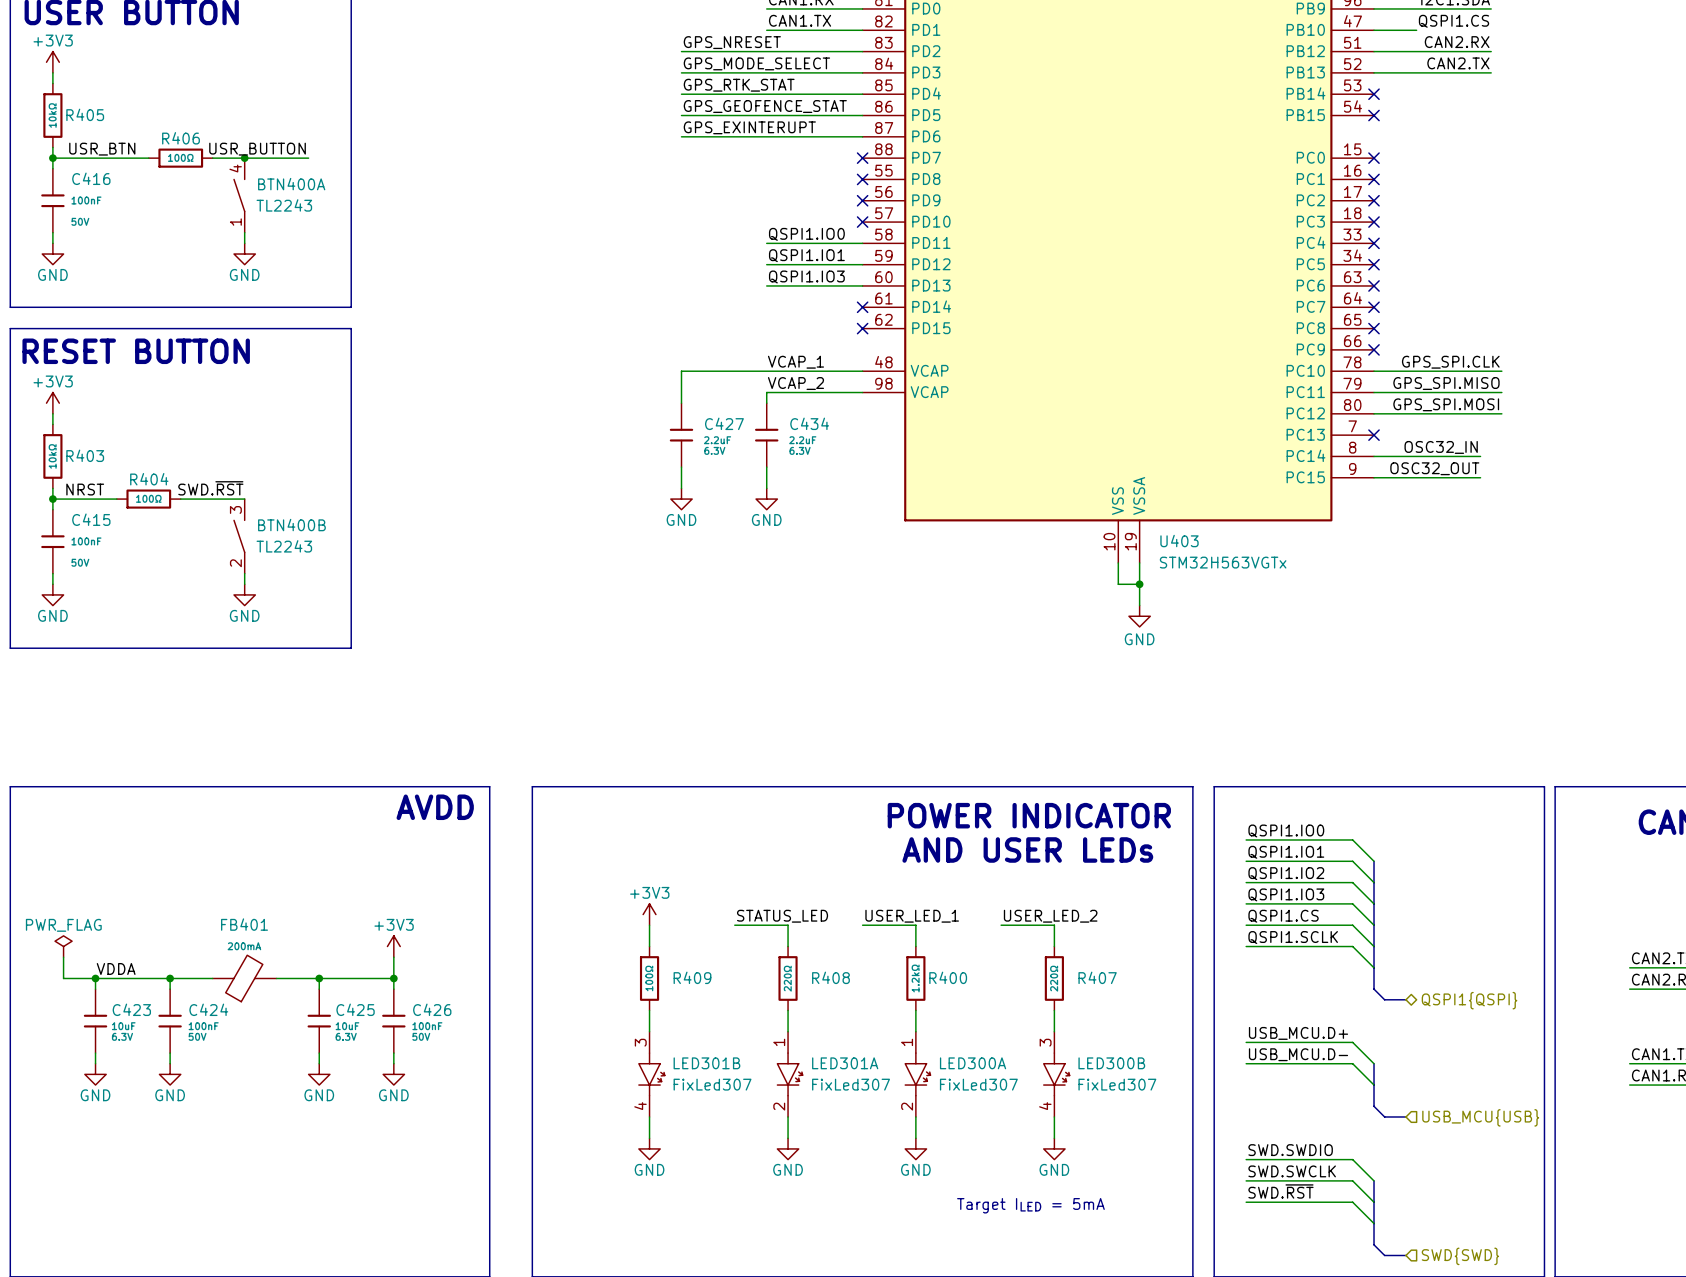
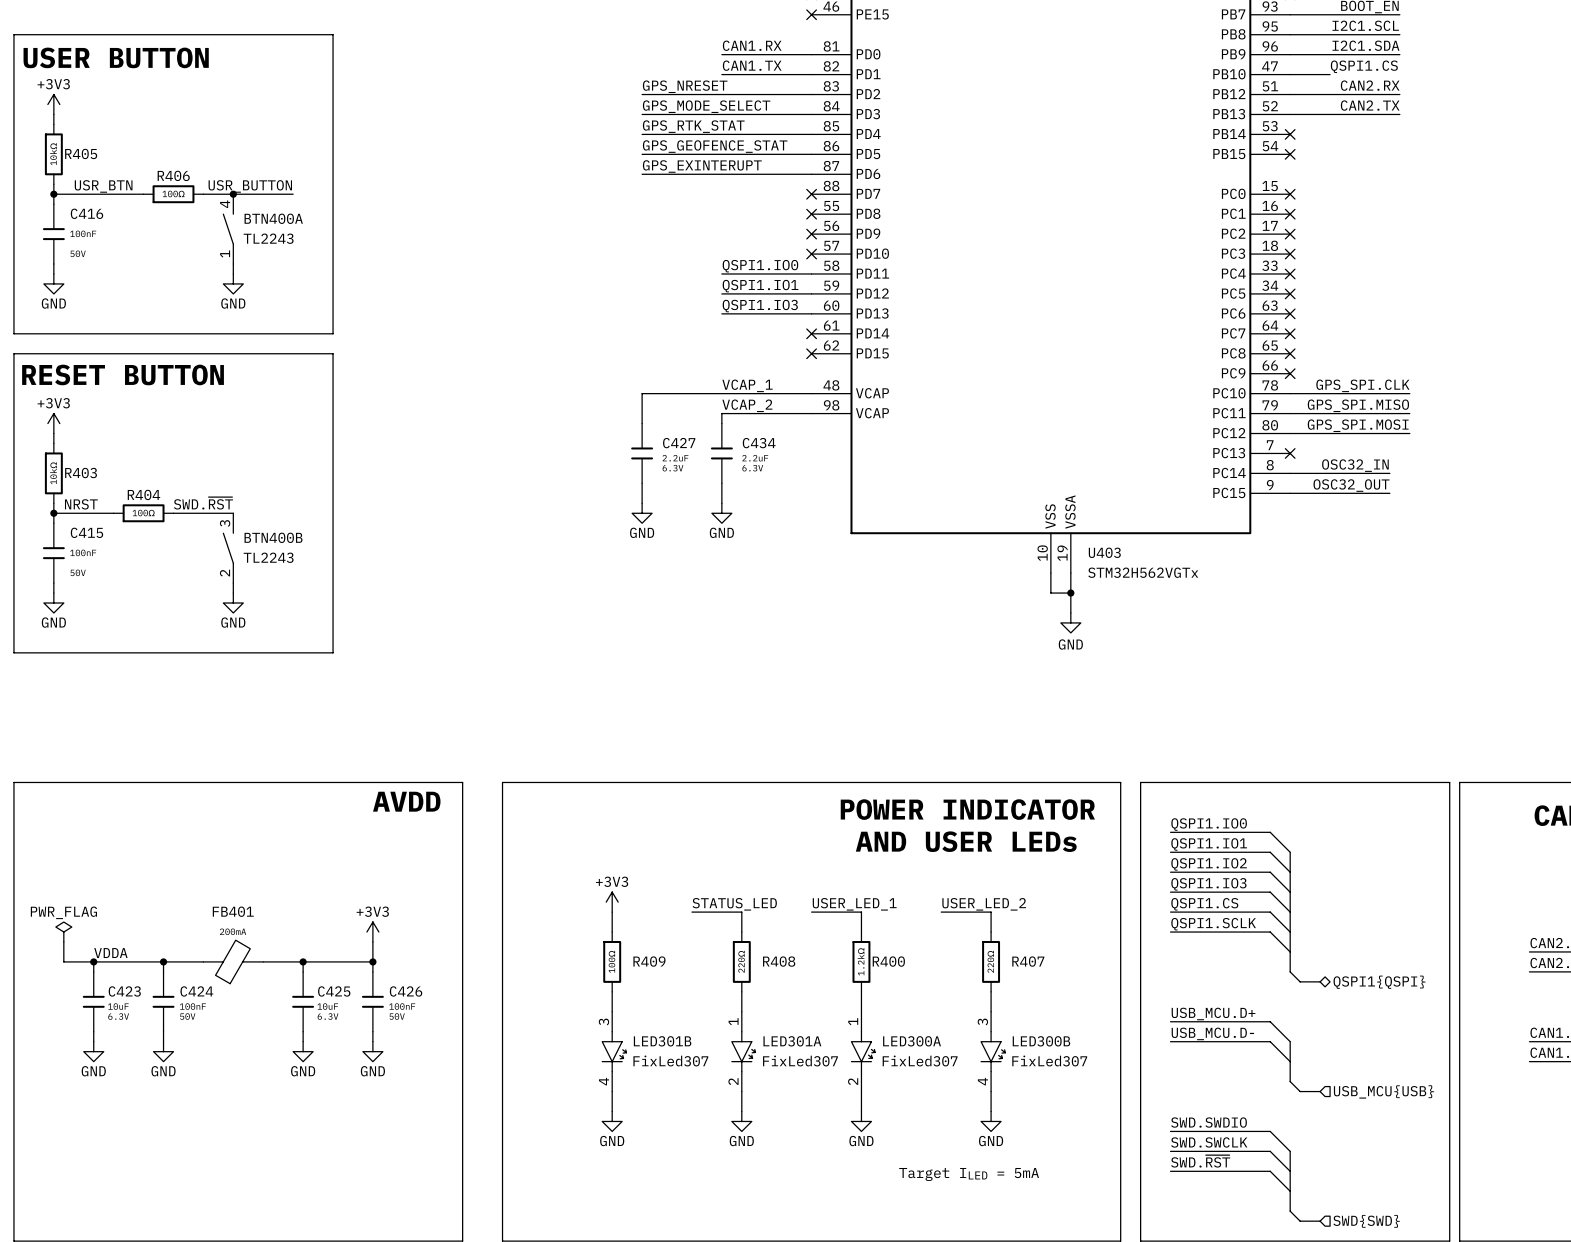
U403 value: STM32H563VGTx (1223, 562) -> STM32H562VGTx (1143, 572)

